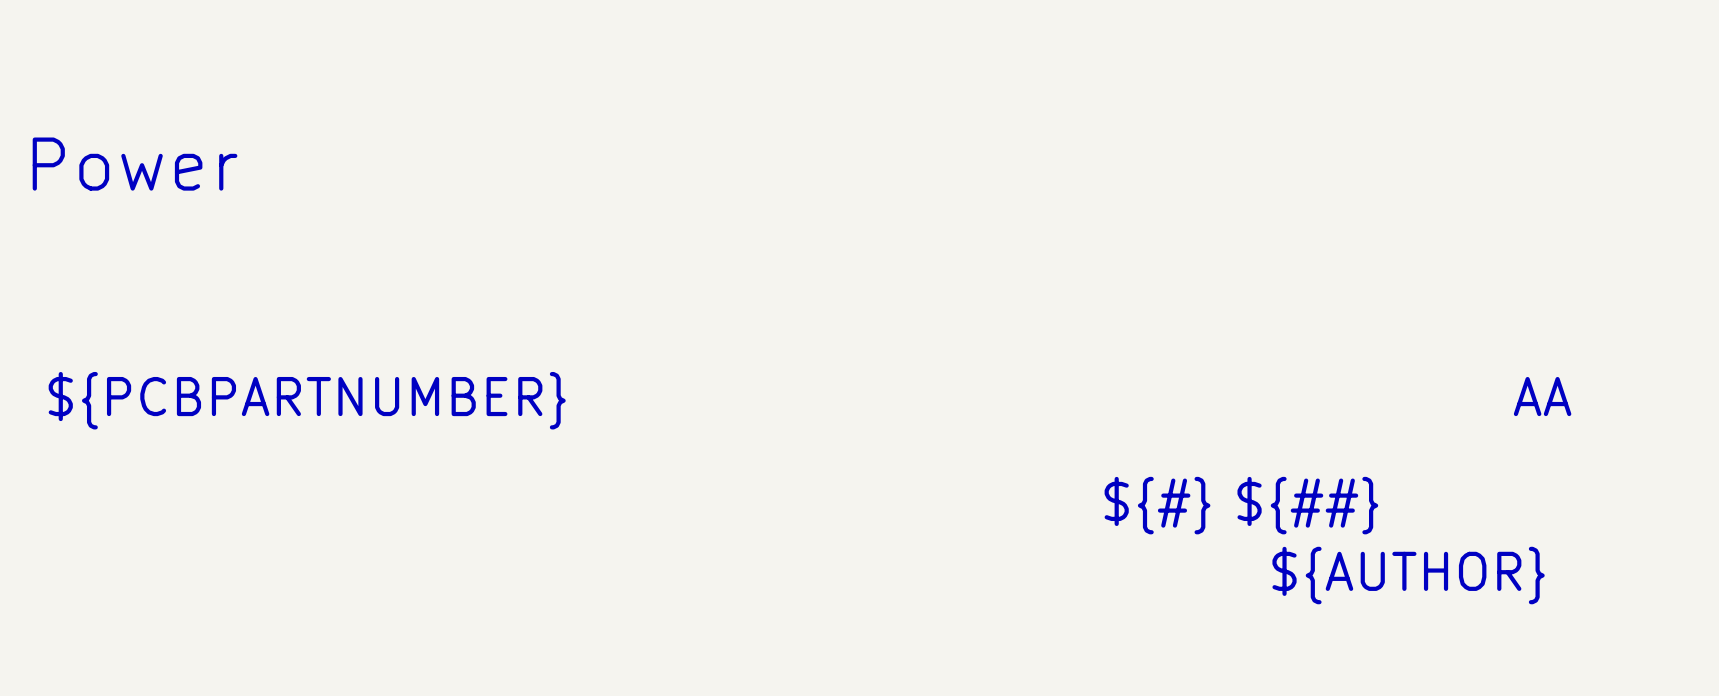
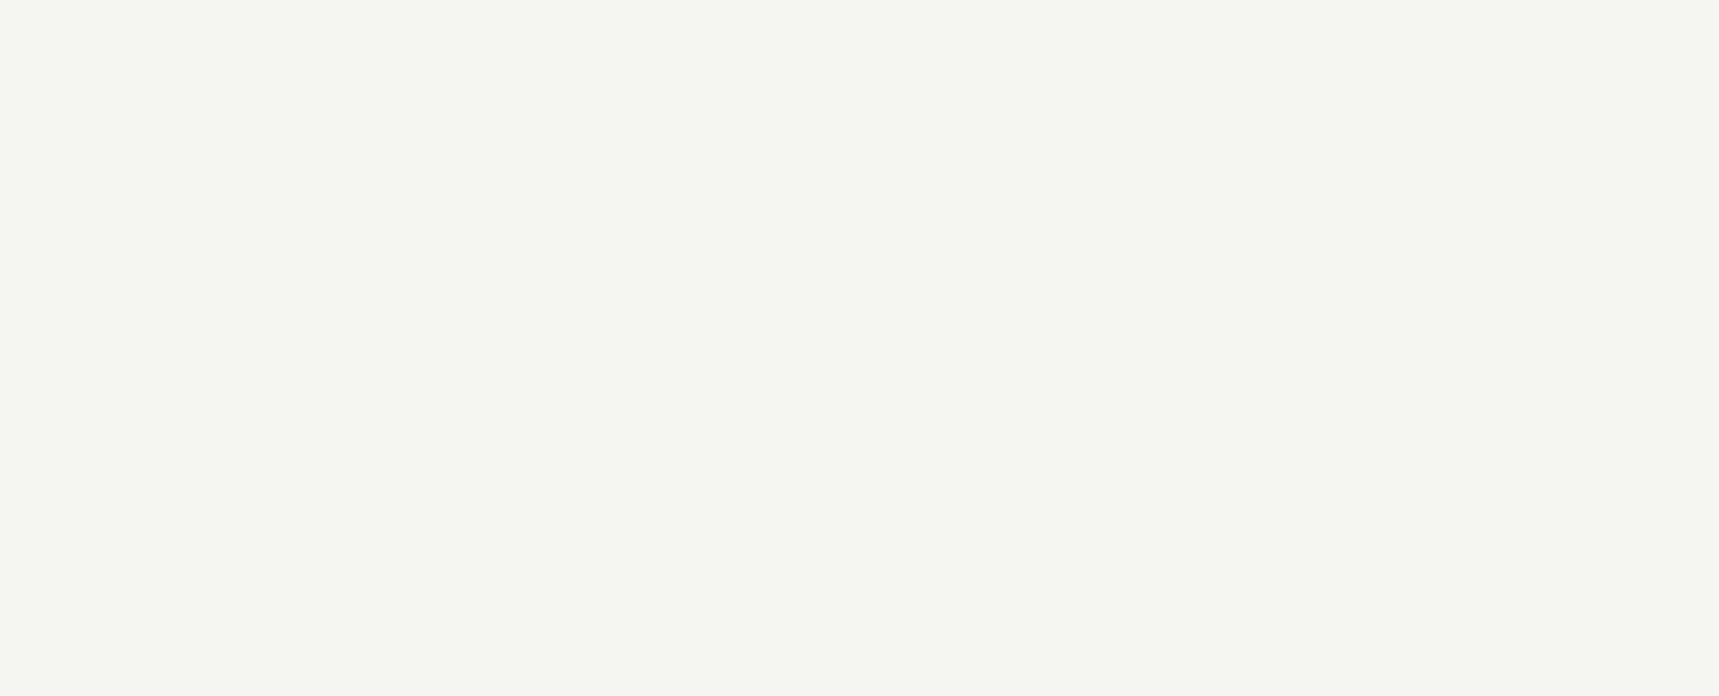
text: Power (135, 164) -> none
text: AA (1542, 396) -> none
text: ${PCBPARTNUMBER} (307, 400) -> none
text: ${#} (1157, 505) -> none
text: ${##} (1307, 505) -> none
text: ${AUTHOR} (1408, 575) -> none

